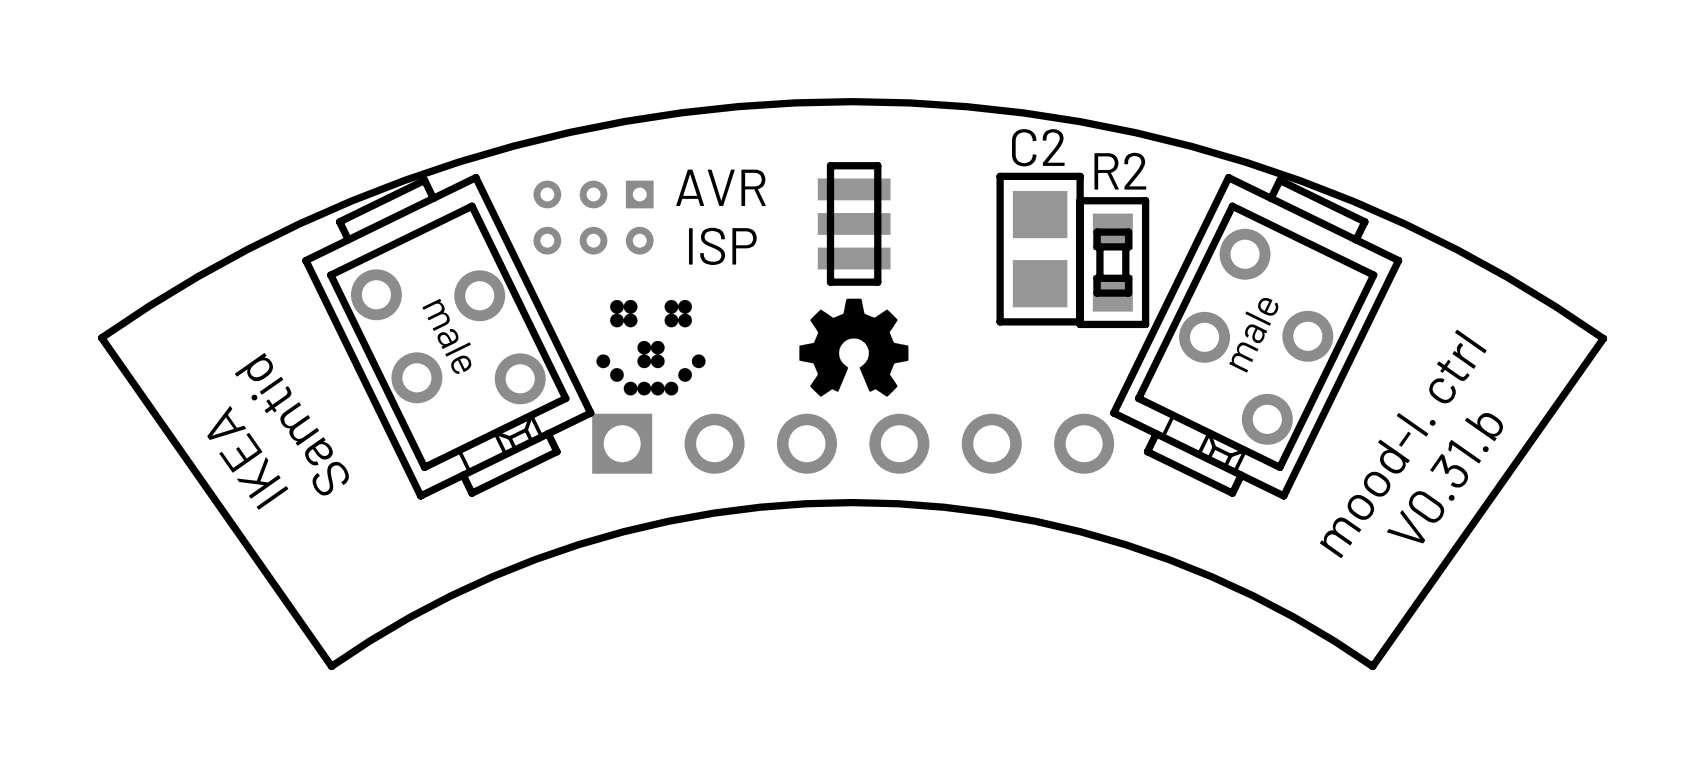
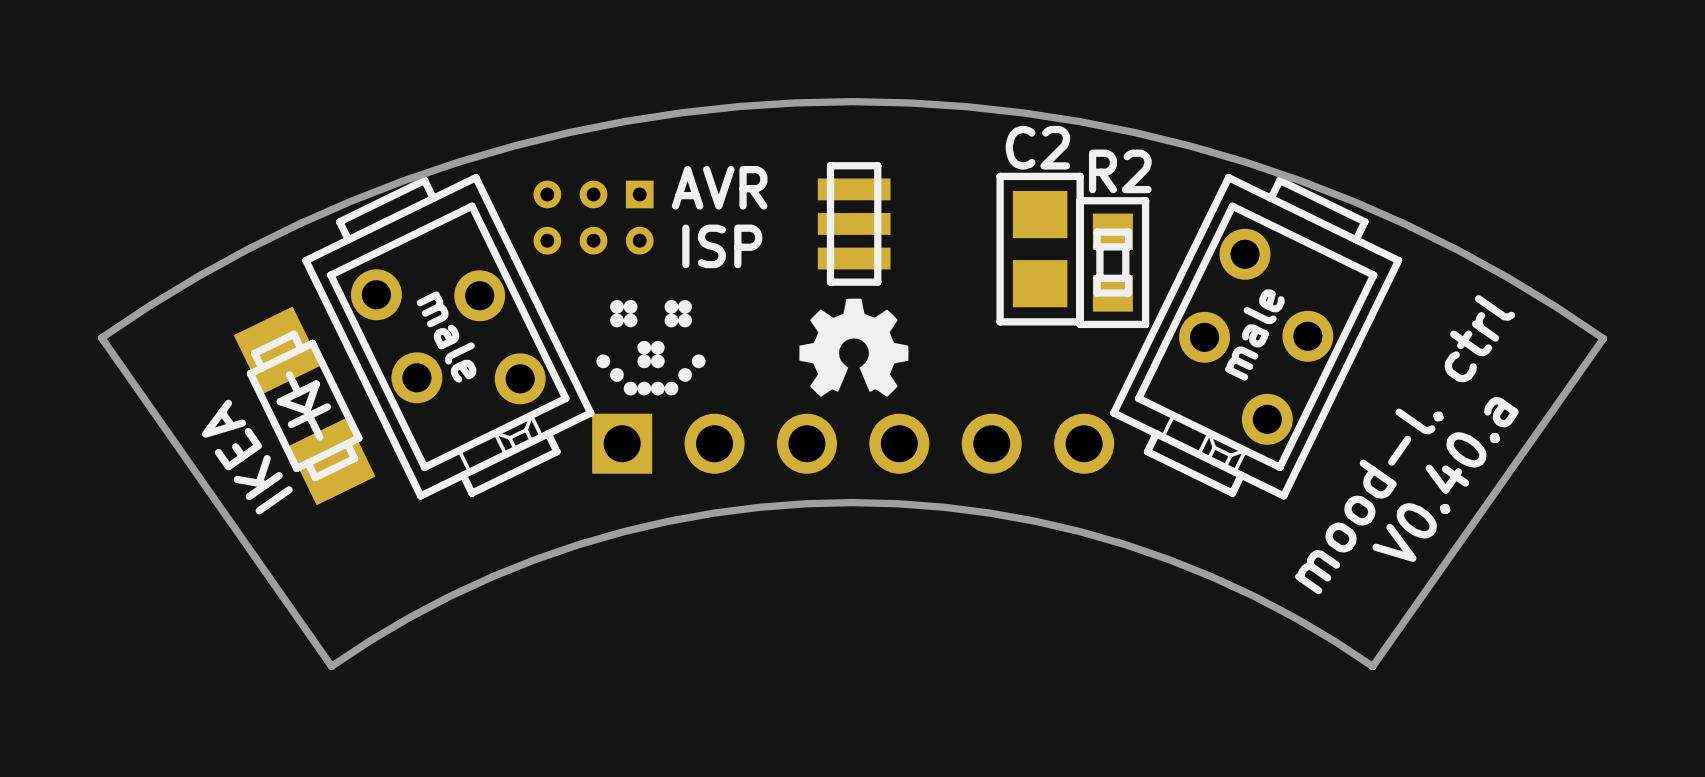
part: none -> (304, 405)
text: Samtid (291, 424) -> none
text: V0.31.b (1444, 477) -> V0.40.a (1445, 479)

